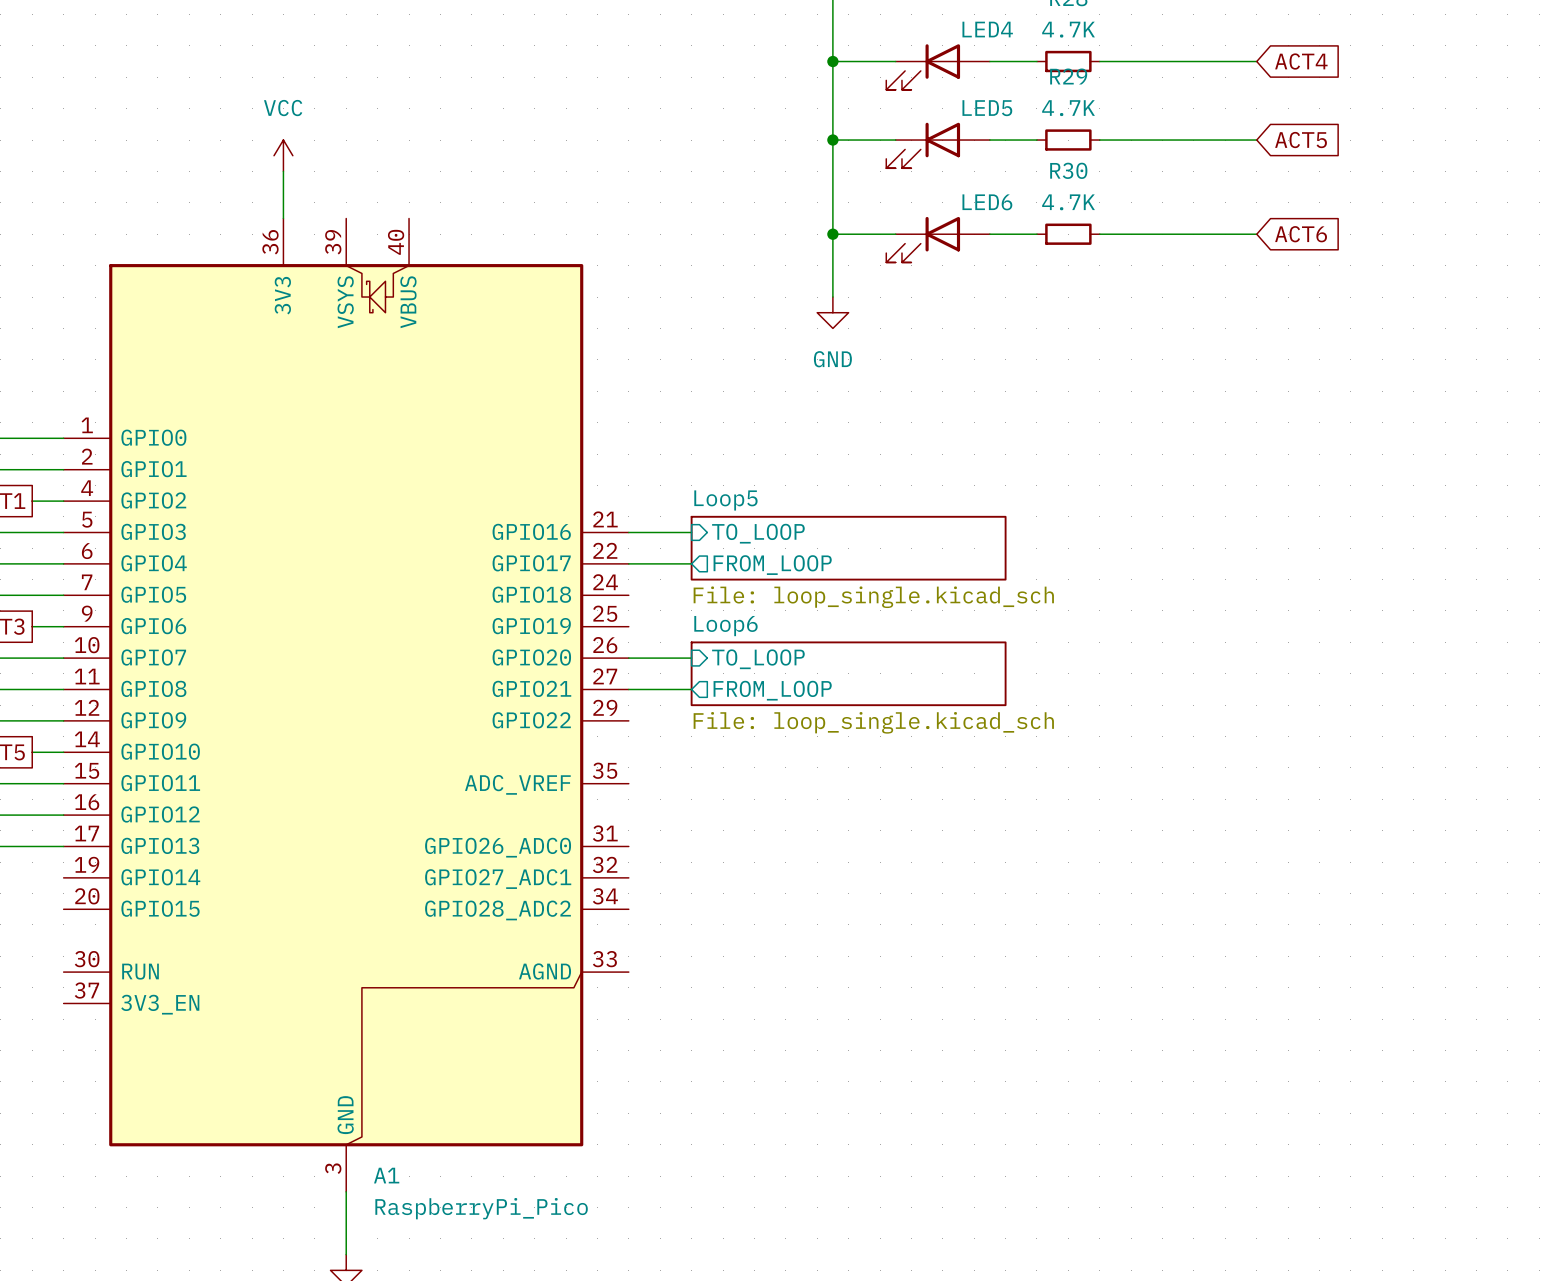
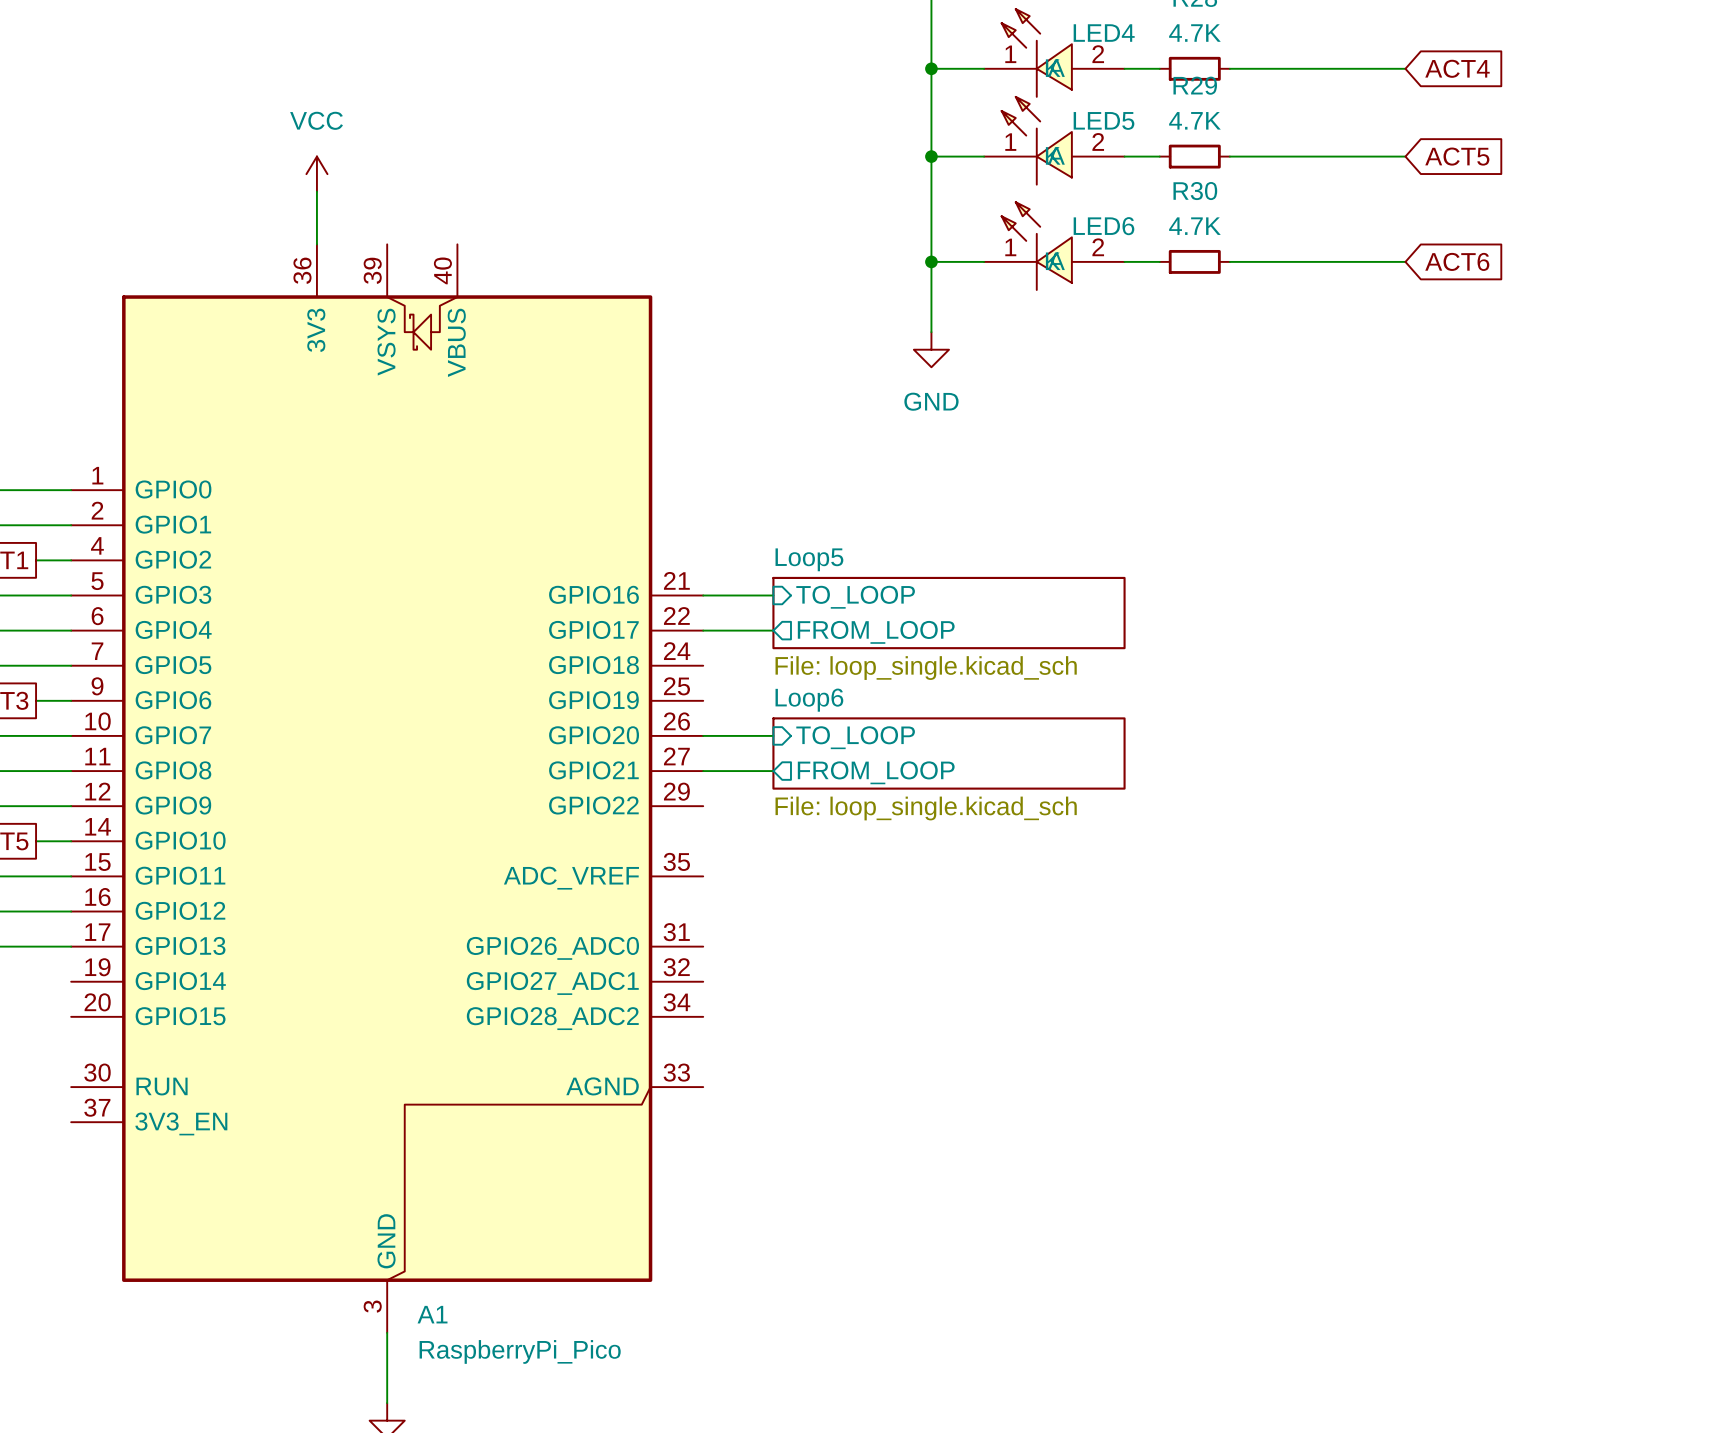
LED4 symbol: [886, 44, 990, 90] -> [984, 9, 1125, 97]
LED5 symbol: [886, 122, 990, 169] -> [984, 96, 1125, 185]
LED6 symbol: [886, 216, 990, 263] -> [984, 202, 1125, 290]

